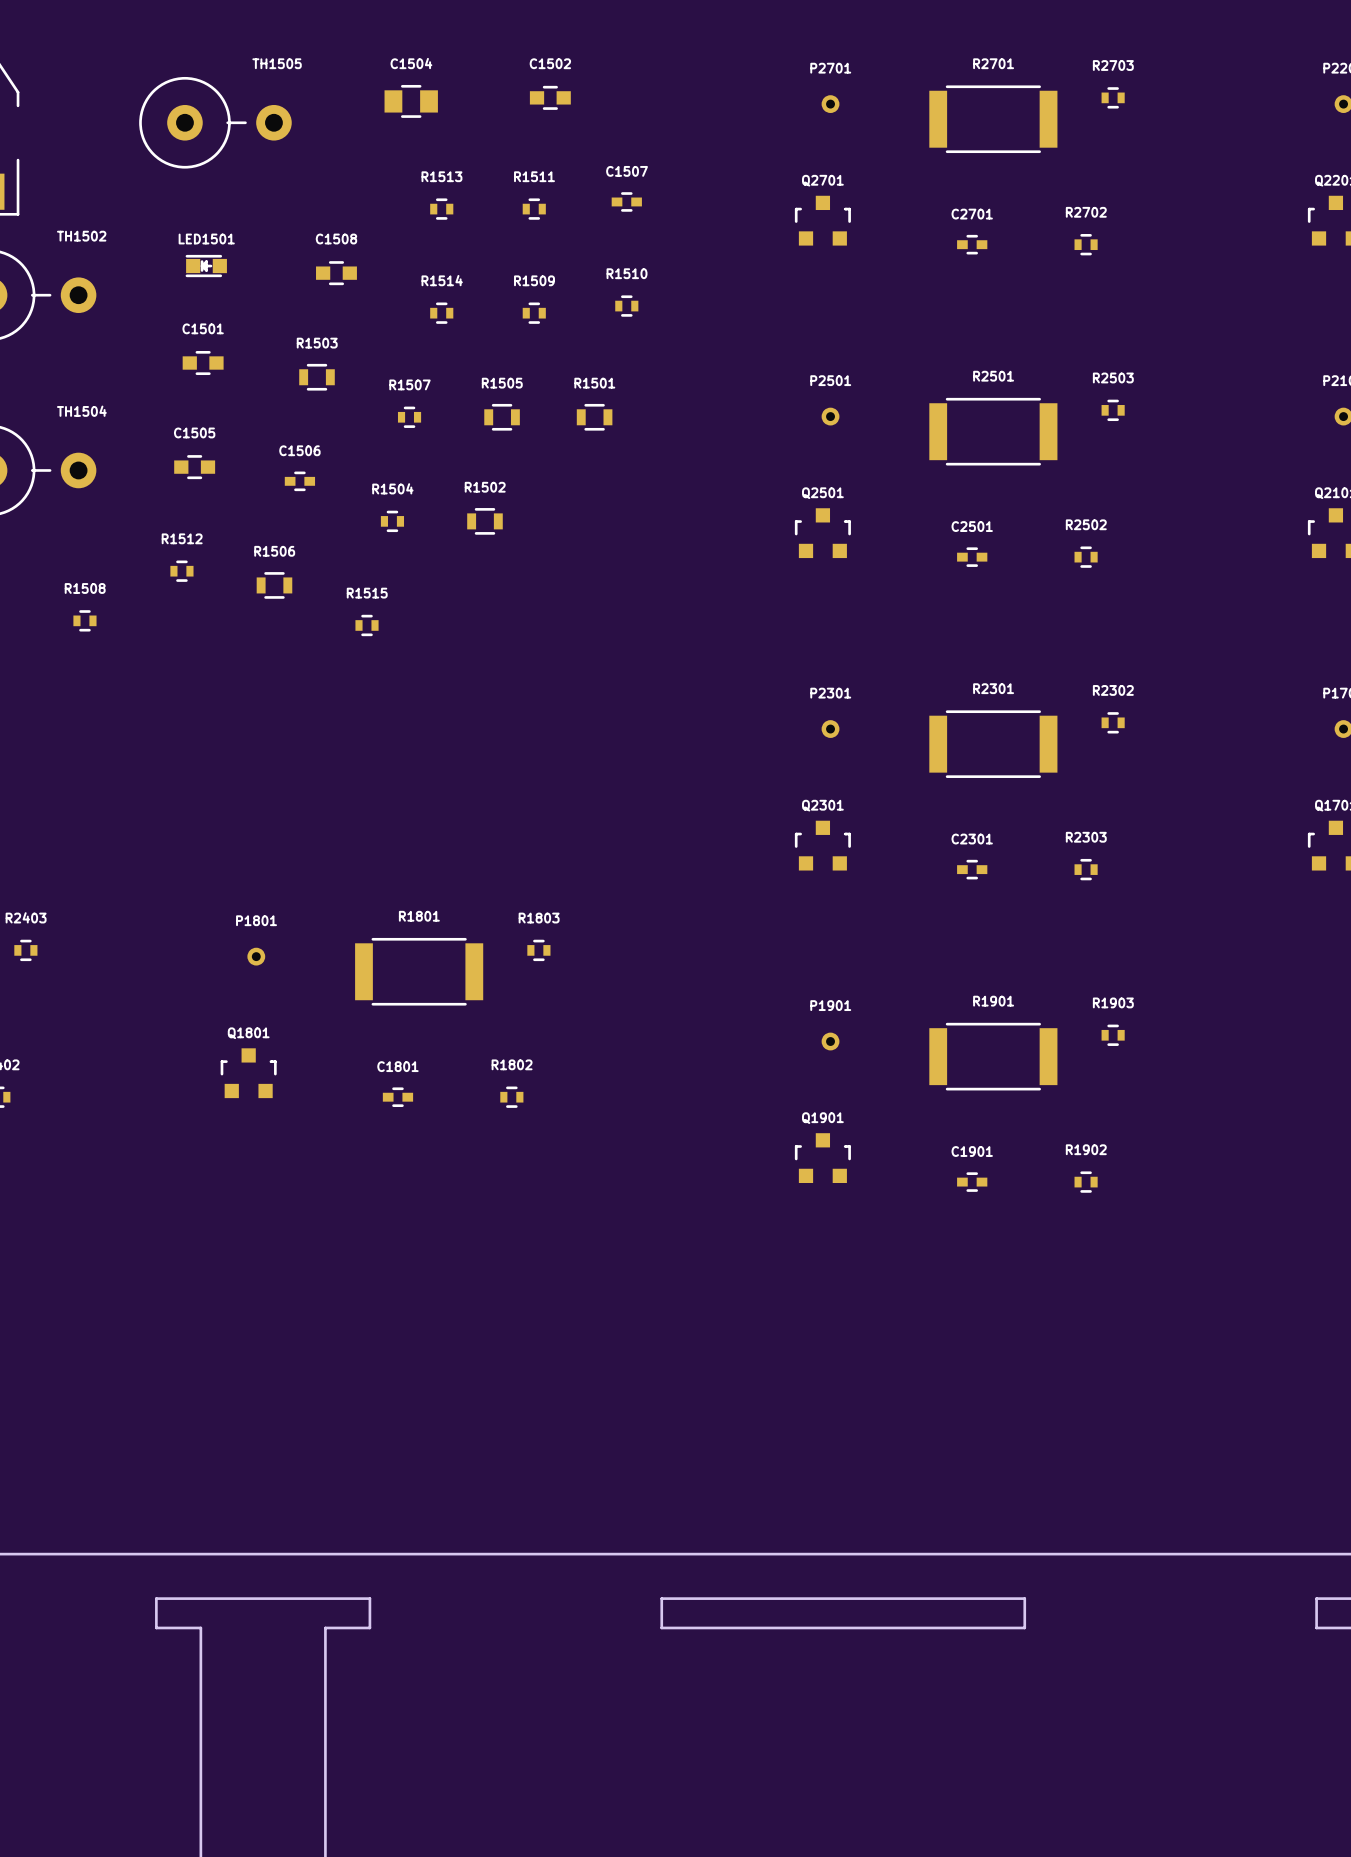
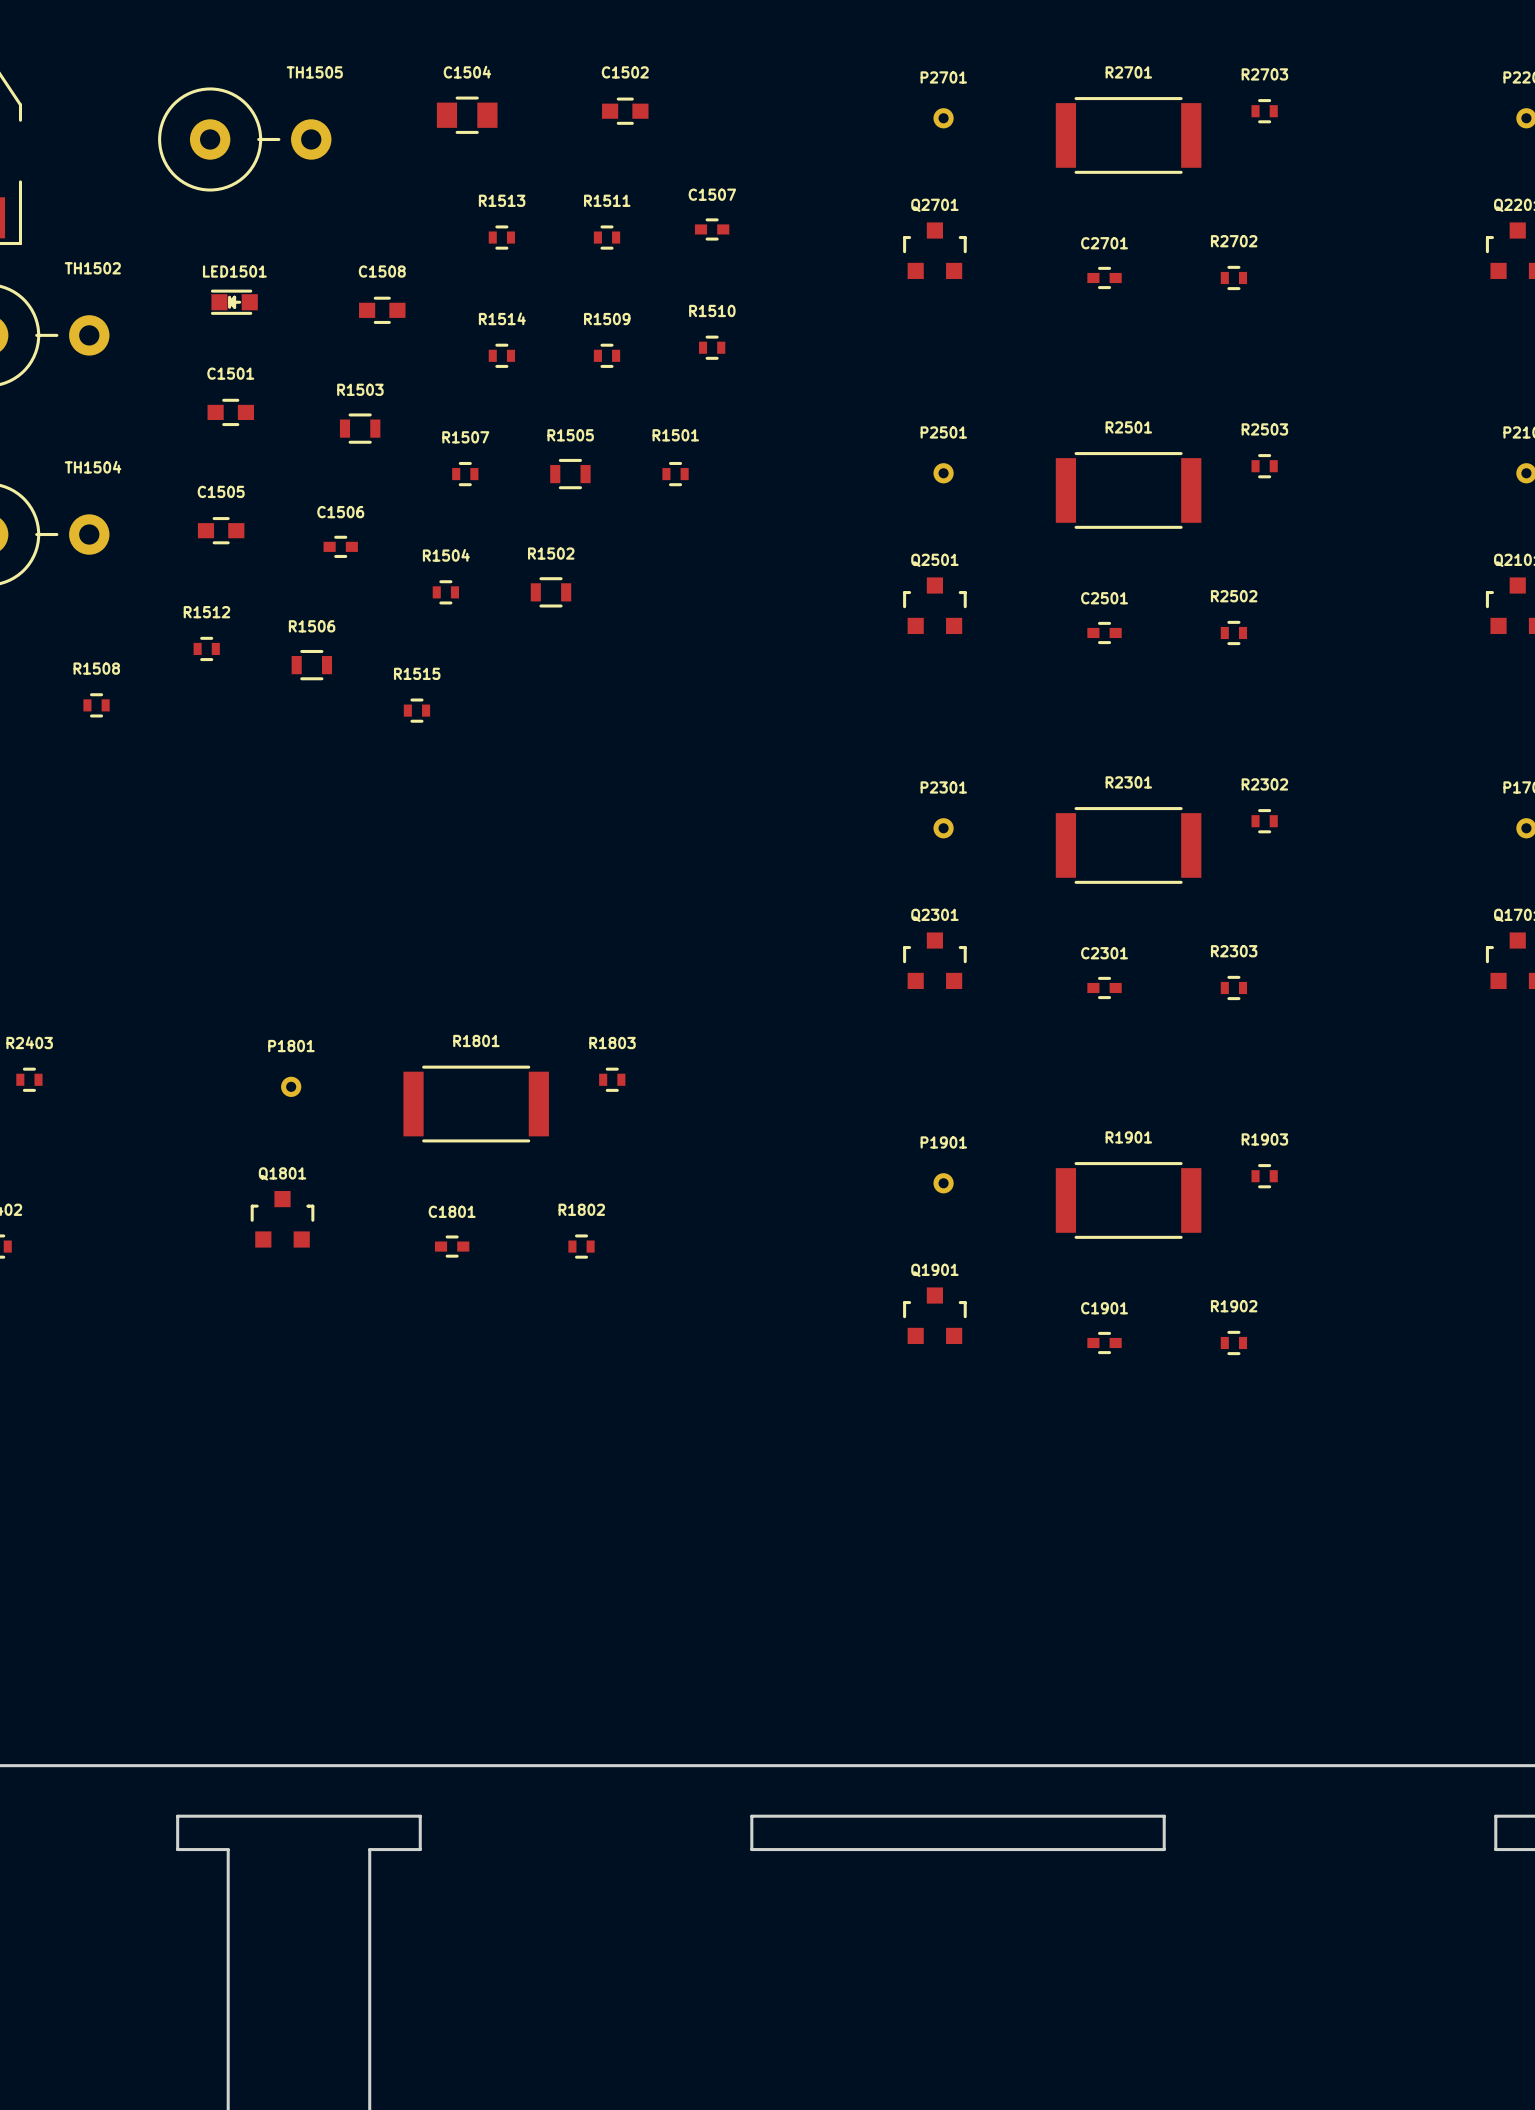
R1501 footprint: [576, 403, 613, 431] -> [662, 461, 689, 487]

